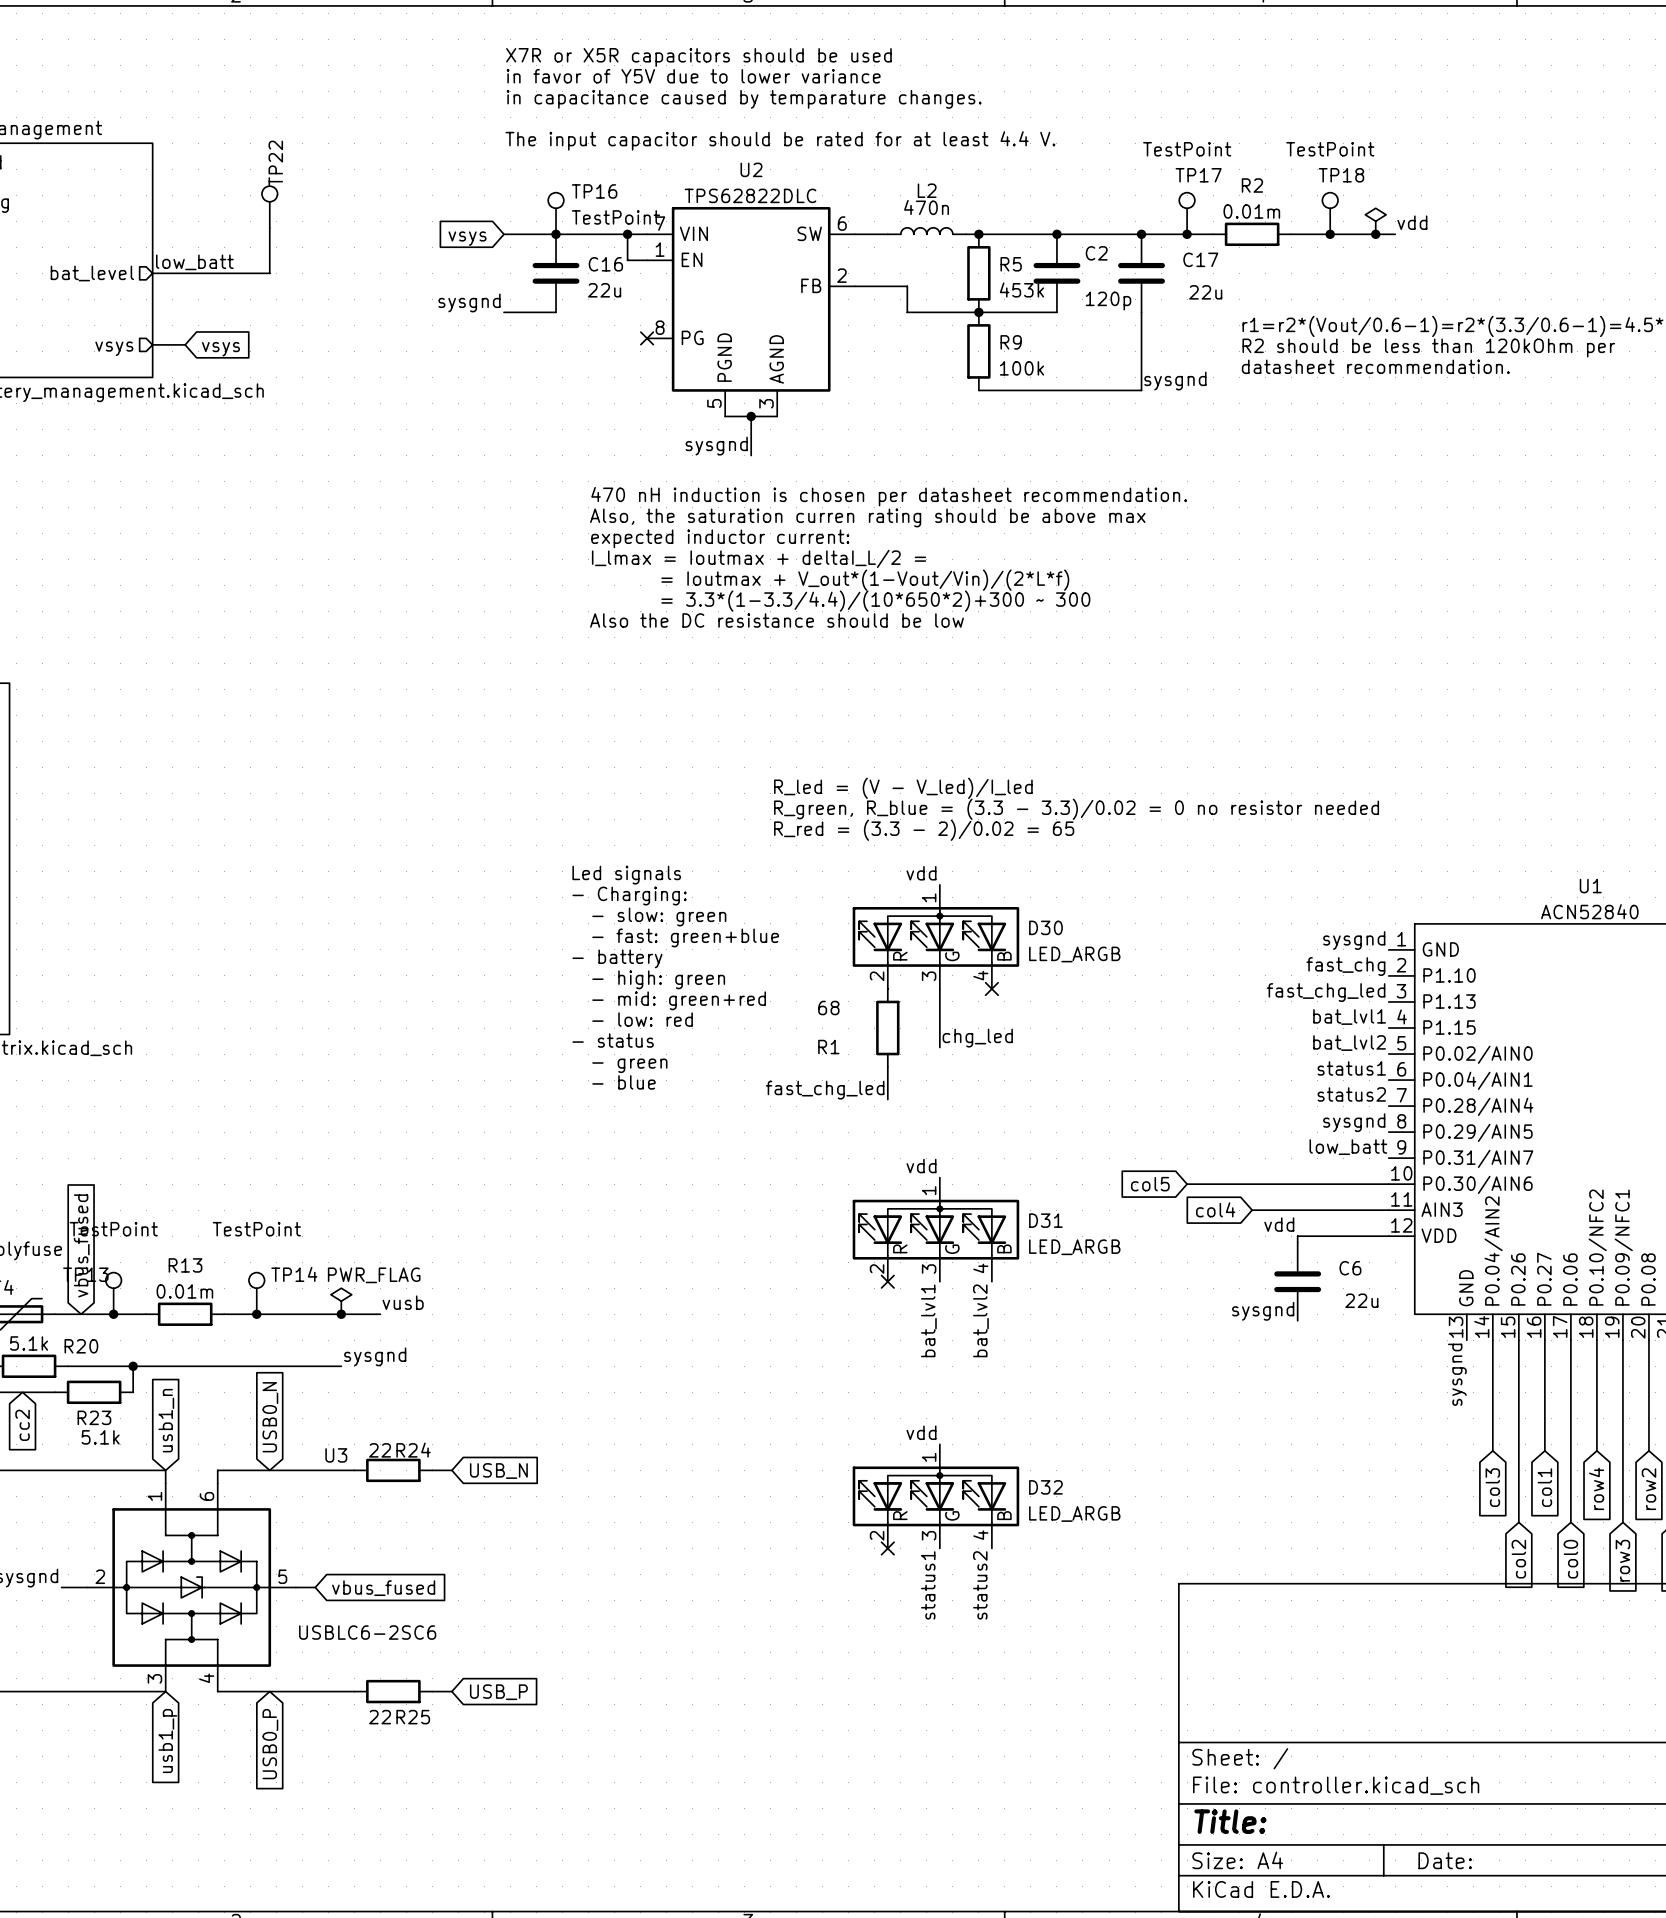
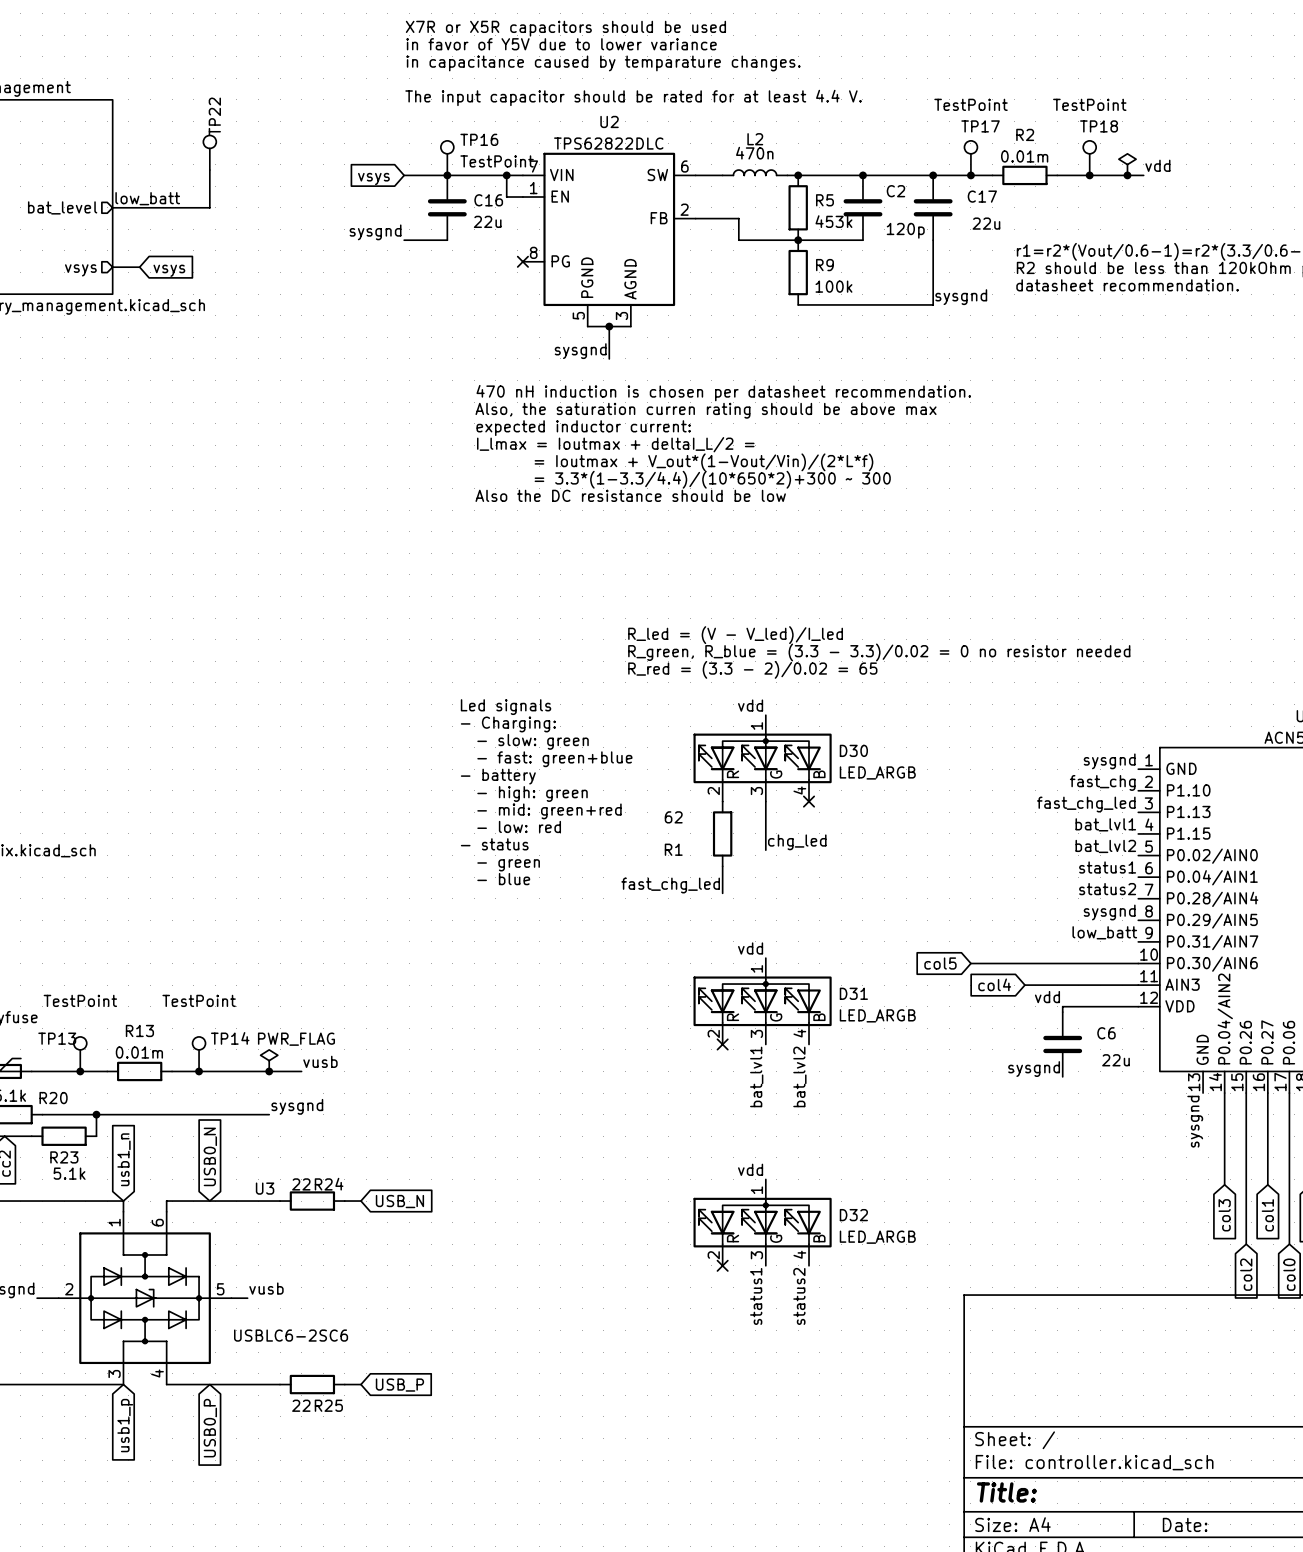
R1 value: 68 (828, 1008) -> 62 (673, 817)
global label: vbus_fused (81, 1245) -> none
label: none -> vusb (266, 1288)
global label: vbus_fused (383, 1588) -> none

